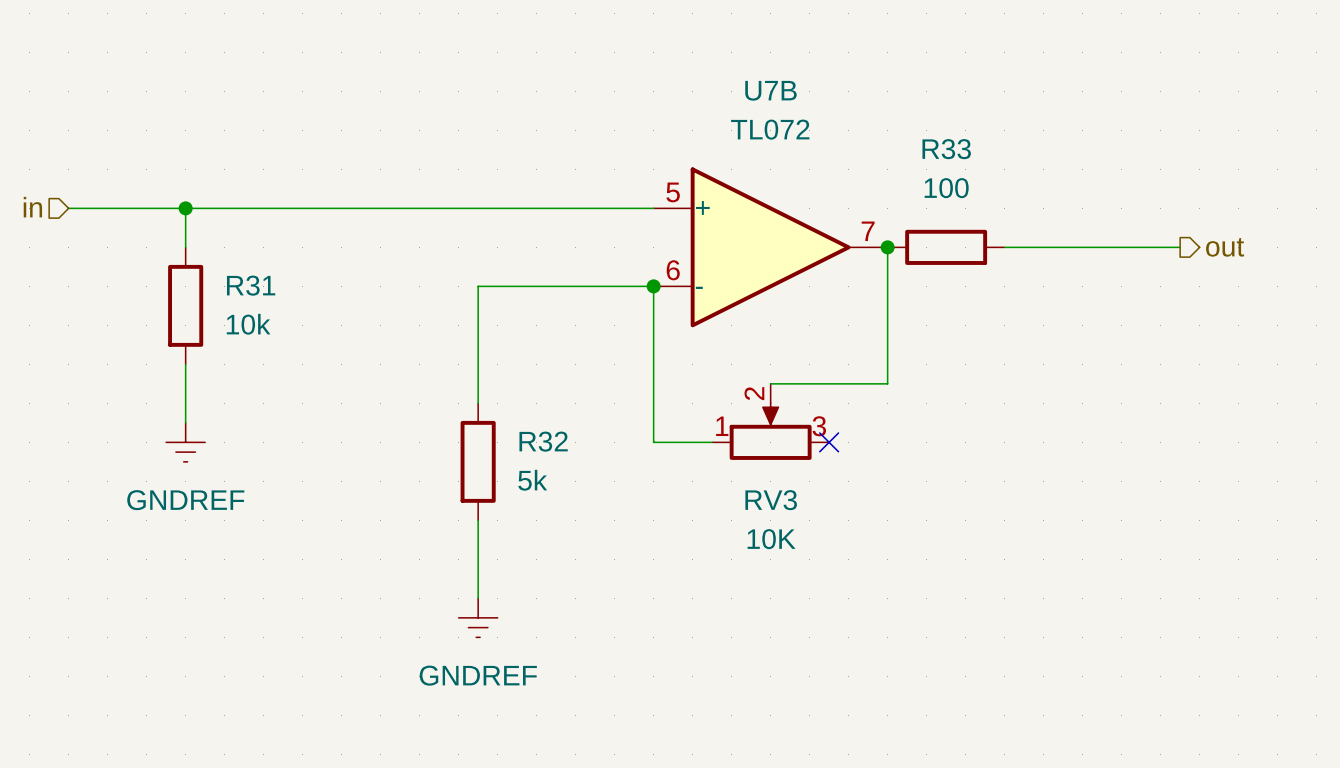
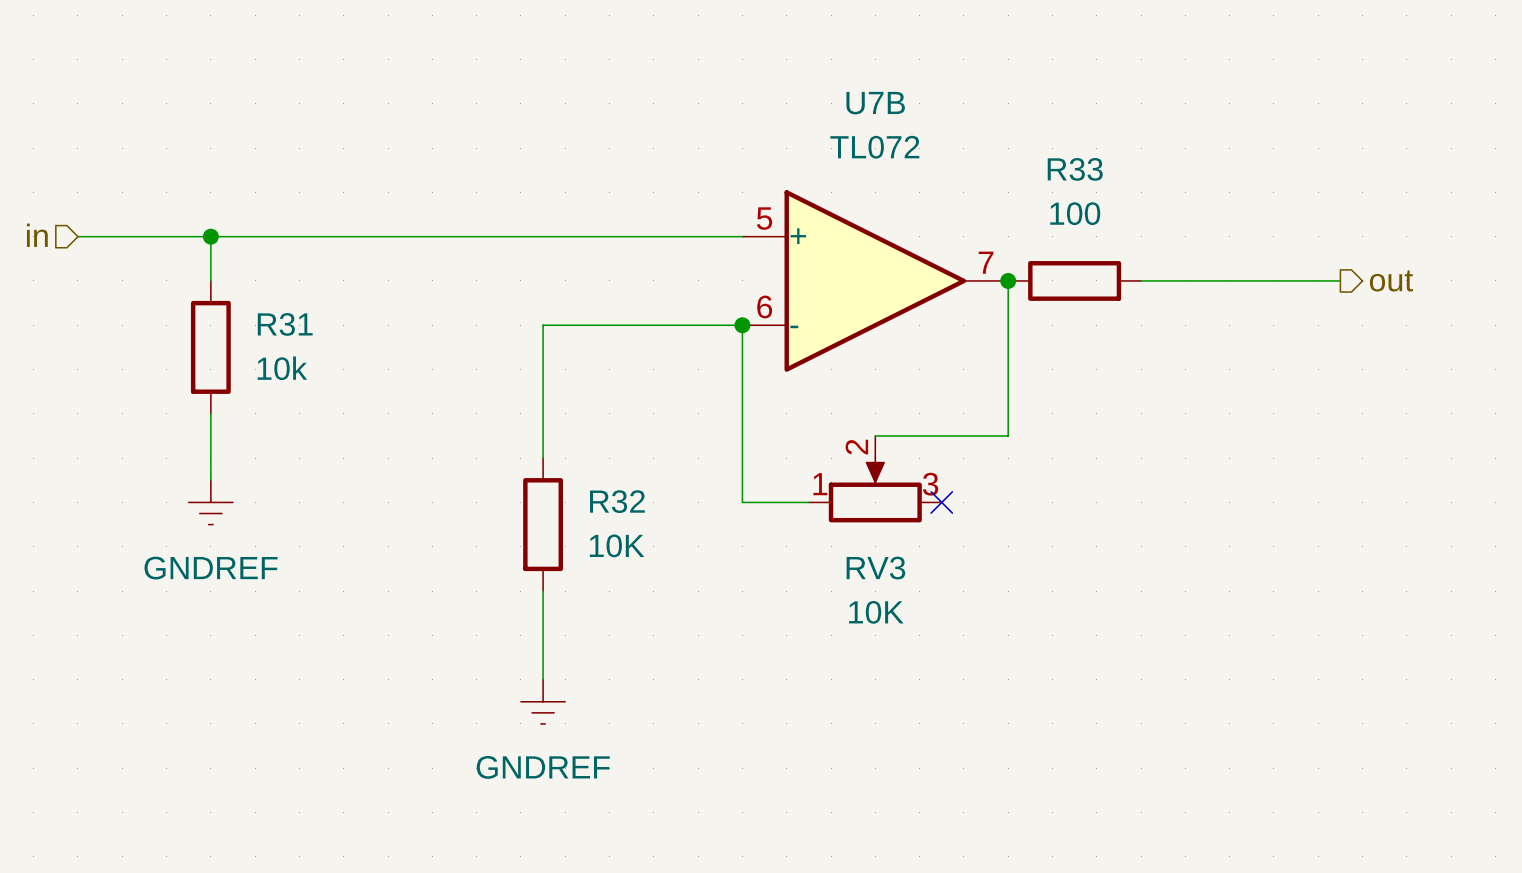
R32 value: 5k (532, 480) -> 10K (617, 545)

